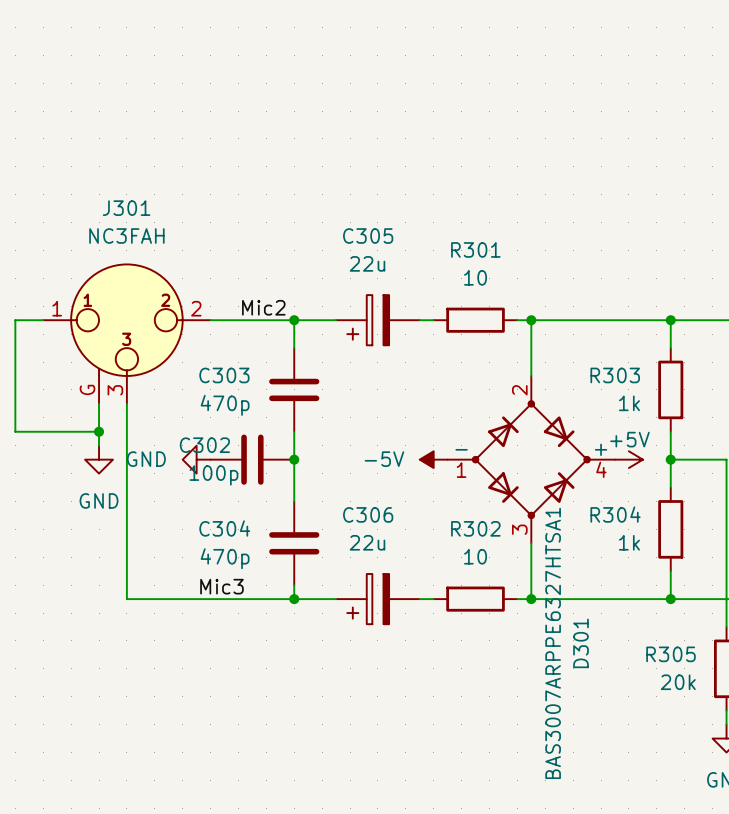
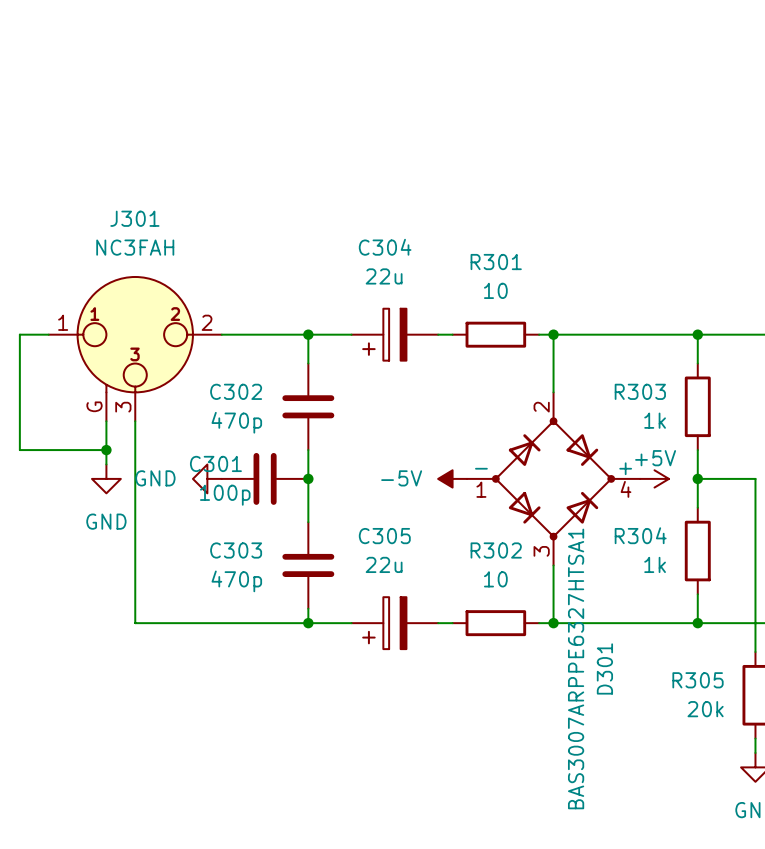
C305 name: C305 (368, 236) -> C304 (385, 247)
label: Mic2 (263, 307) -> none
C303 name: C303 (224, 375) -> C302 (236, 391)
C302 name: C302 (204, 445) -> C301 (215, 463)
C306 name: C306 (368, 514) -> C305 (384, 536)
C304 name: C304 (224, 528) -> C303 (236, 550)
label: Mic3 (221, 586) -> none

